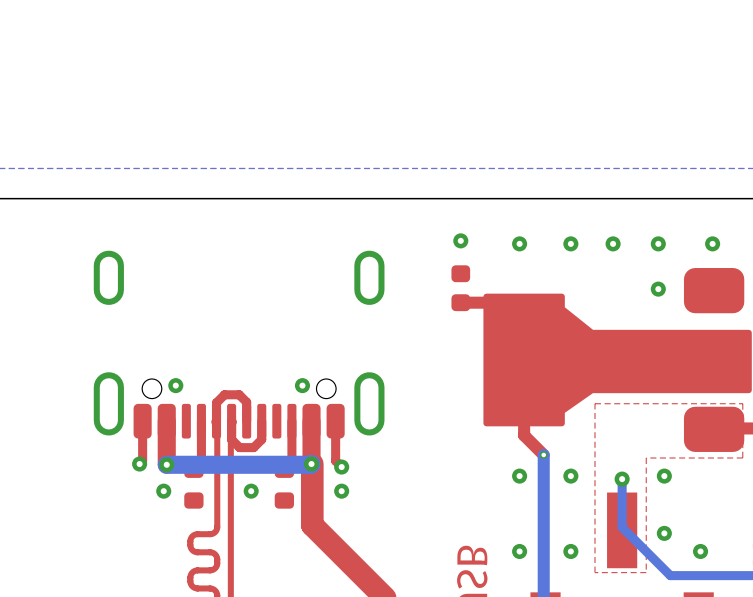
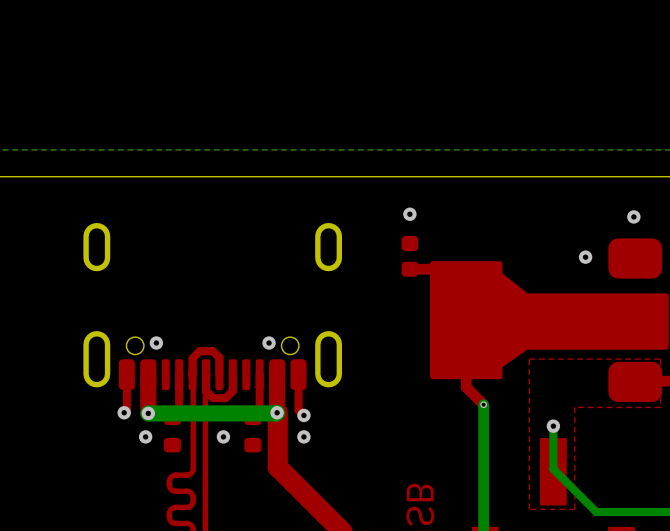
via: (519, 243) -> none
via: (570, 243) -> none
via: (613, 243) -> none
via: (658, 243) -> none
via: (519, 476) -> none
via: (570, 476) -> none
via: (664, 476) -> none
via: (664, 533) -> none
via: (519, 551) -> none
via: (570, 551) -> none
via: (700, 551) -> none

